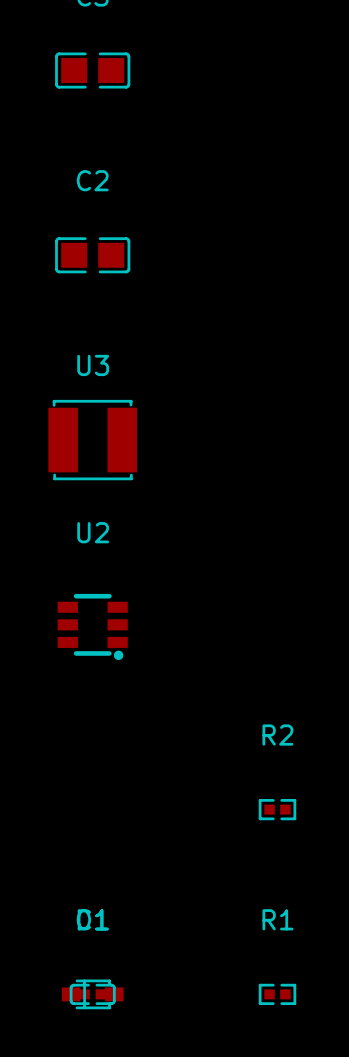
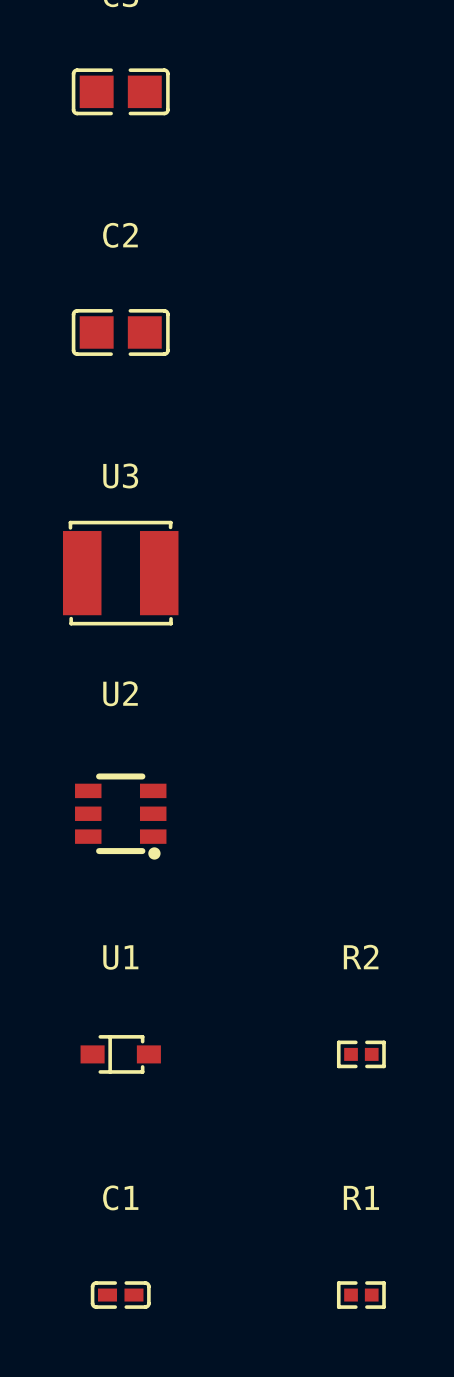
U1: none -> (120, 1054)
part: (92, 994) -> none

